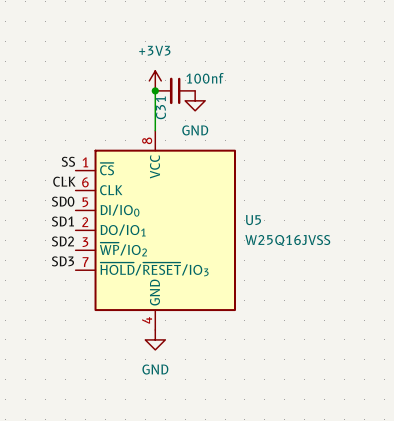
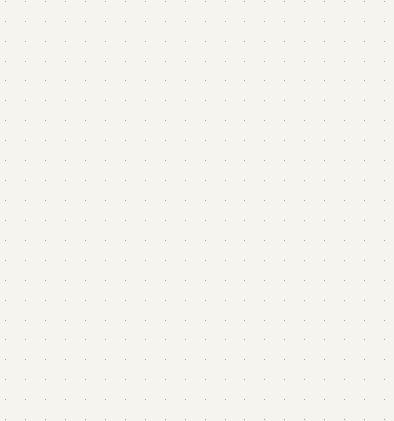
power symbol: +3V3 (155, 80) -> none
wire: (155, 90) (155, 130) -> none
junction: (155, 90) -> none
C31: 100nf (175, 90) -> none
power symbol: GND (195, 100) -> none
label: SS (68, 161) -> none
label: CLK (64, 181) -> none
label: SD0 (63, 201) -> none
label: SD1 (62, 221) -> none
U5: W25Q16JVSS (155, 230) -> none
label: SD2 (62, 241) -> none
label: SD3 (62, 261) -> none
power symbol: GND (155, 339) -> none

